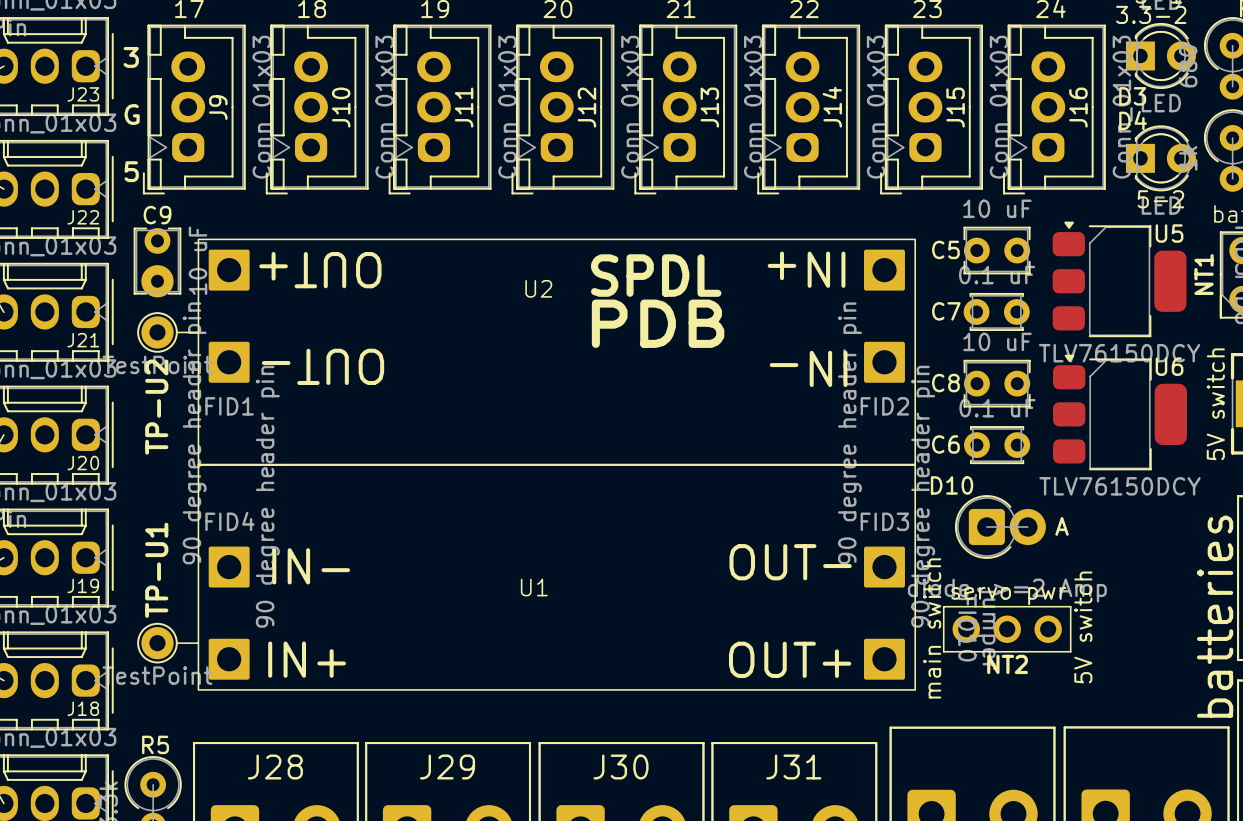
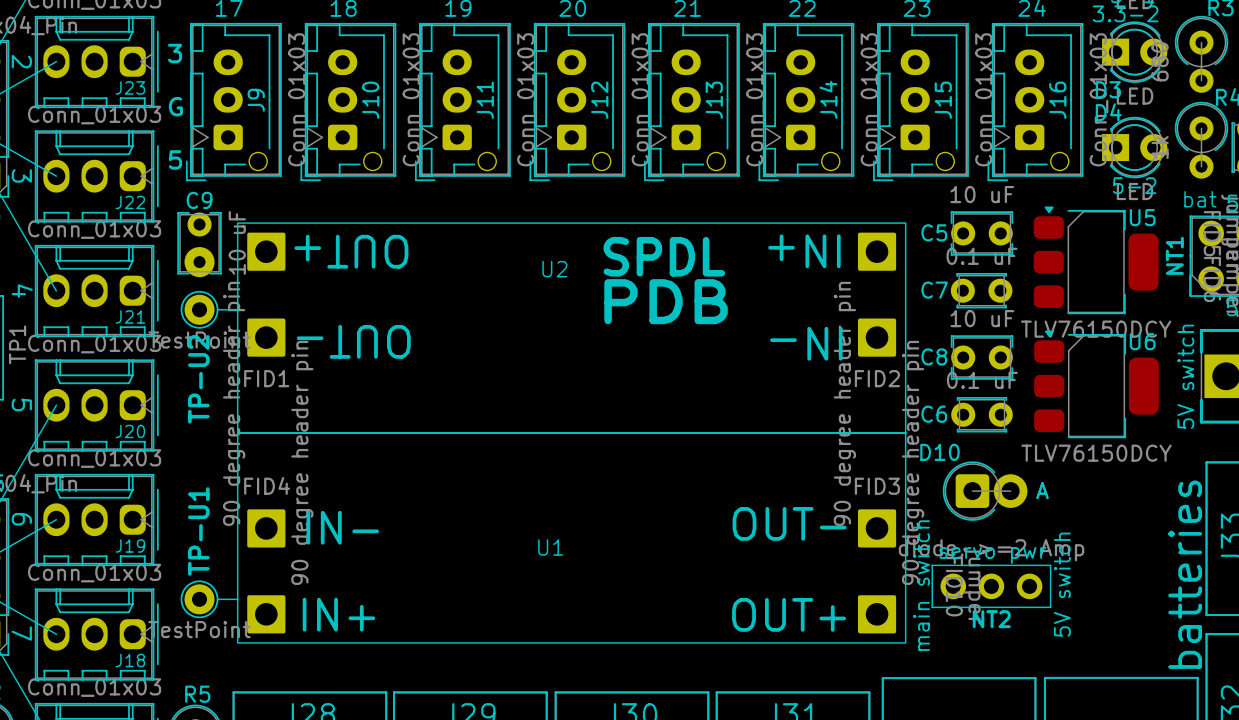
J9 footprint: [142, 24, 246, 195] -> [185, 22, 282, 182]
J10 footprint: [265, 24, 369, 195] -> [300, 22, 397, 182]
J11 footprint: [388, 24, 492, 195] -> [414, 22, 511, 182]
J12 footprint: [511, 24, 615, 195] -> [529, 22, 626, 182]
J13 footprint: [634, 24, 738, 195] -> [643, 22, 740, 182]
J14 footprint: [757, 24, 861, 195] -> [758, 22, 855, 182]
J15 footprint: [880, 24, 984, 195] -> [872, 22, 969, 182]
J16 footprint: [1003, 24, 1106, 195] -> [987, 22, 1084, 182]

